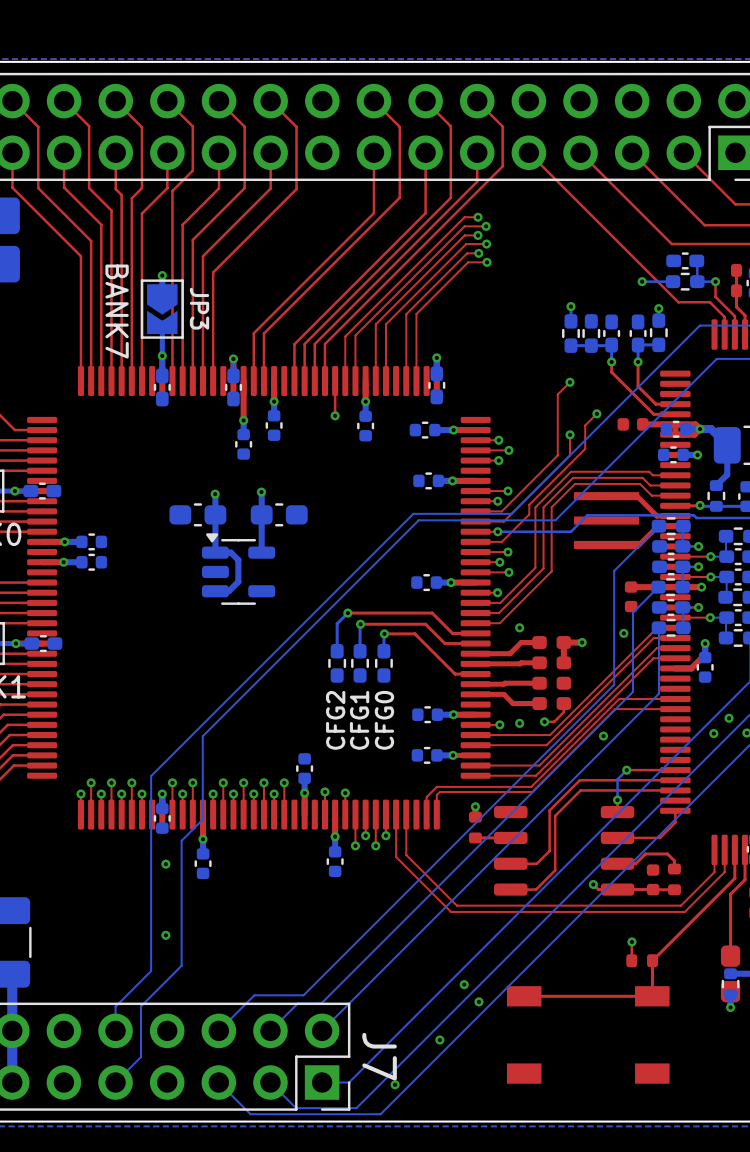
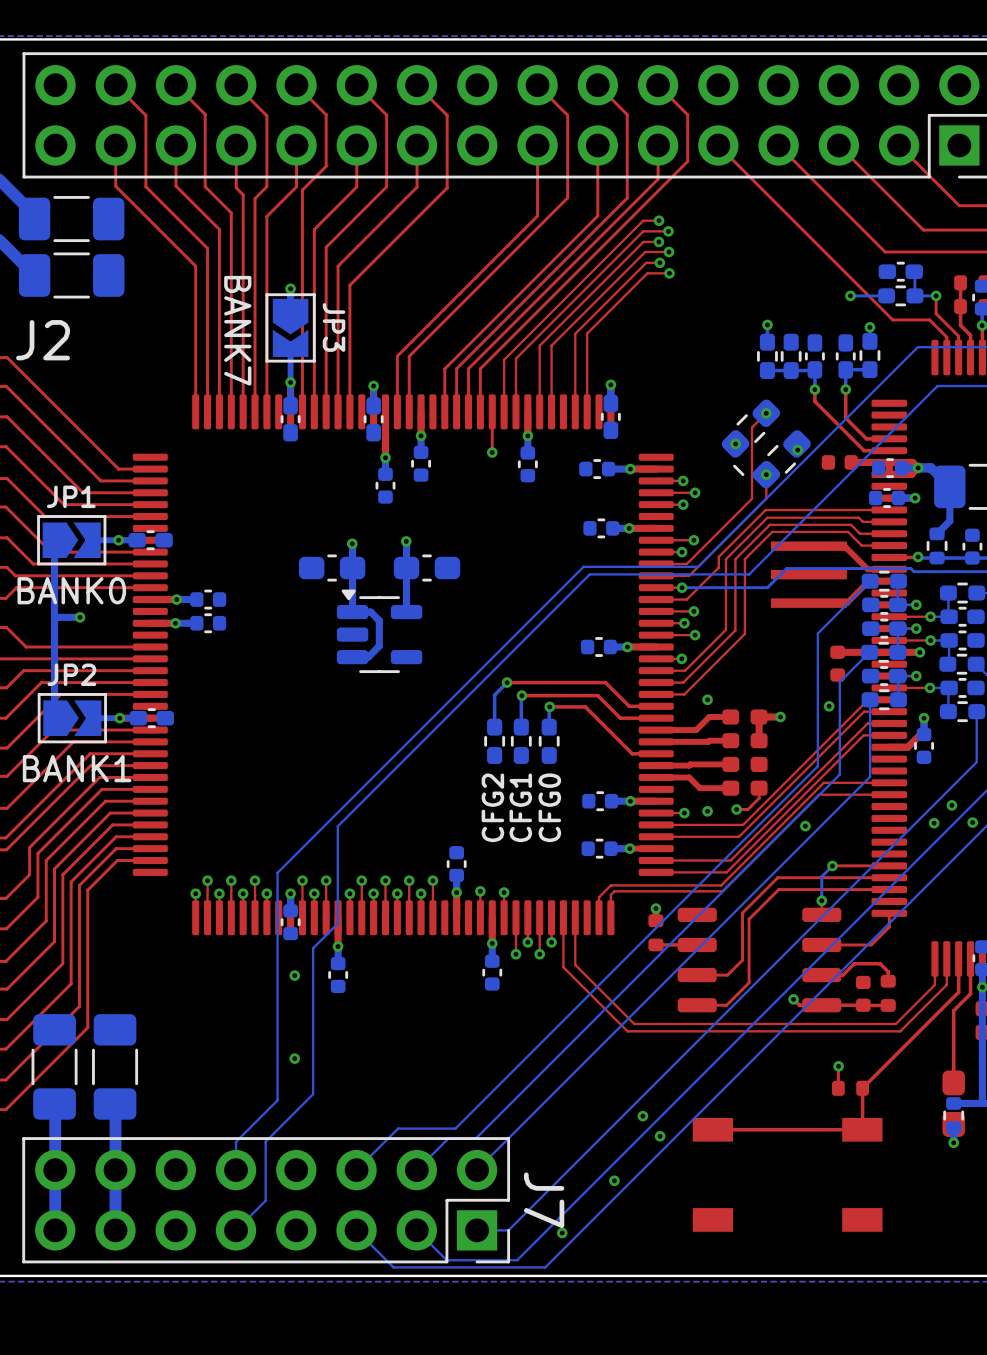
via: none -> (735, 443)
part: none -> (766, 443)
top track: (596, 413) (585, 425) (585, 448) (529, 505) -> (889, 510) (765, 510) (718, 556)

